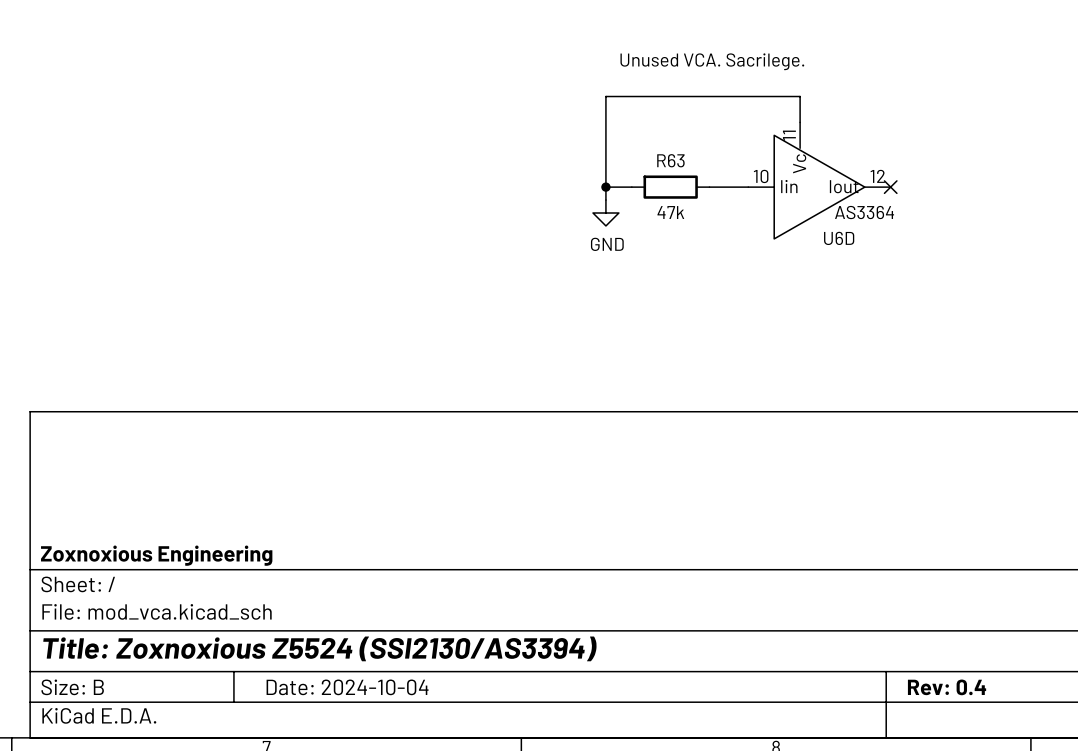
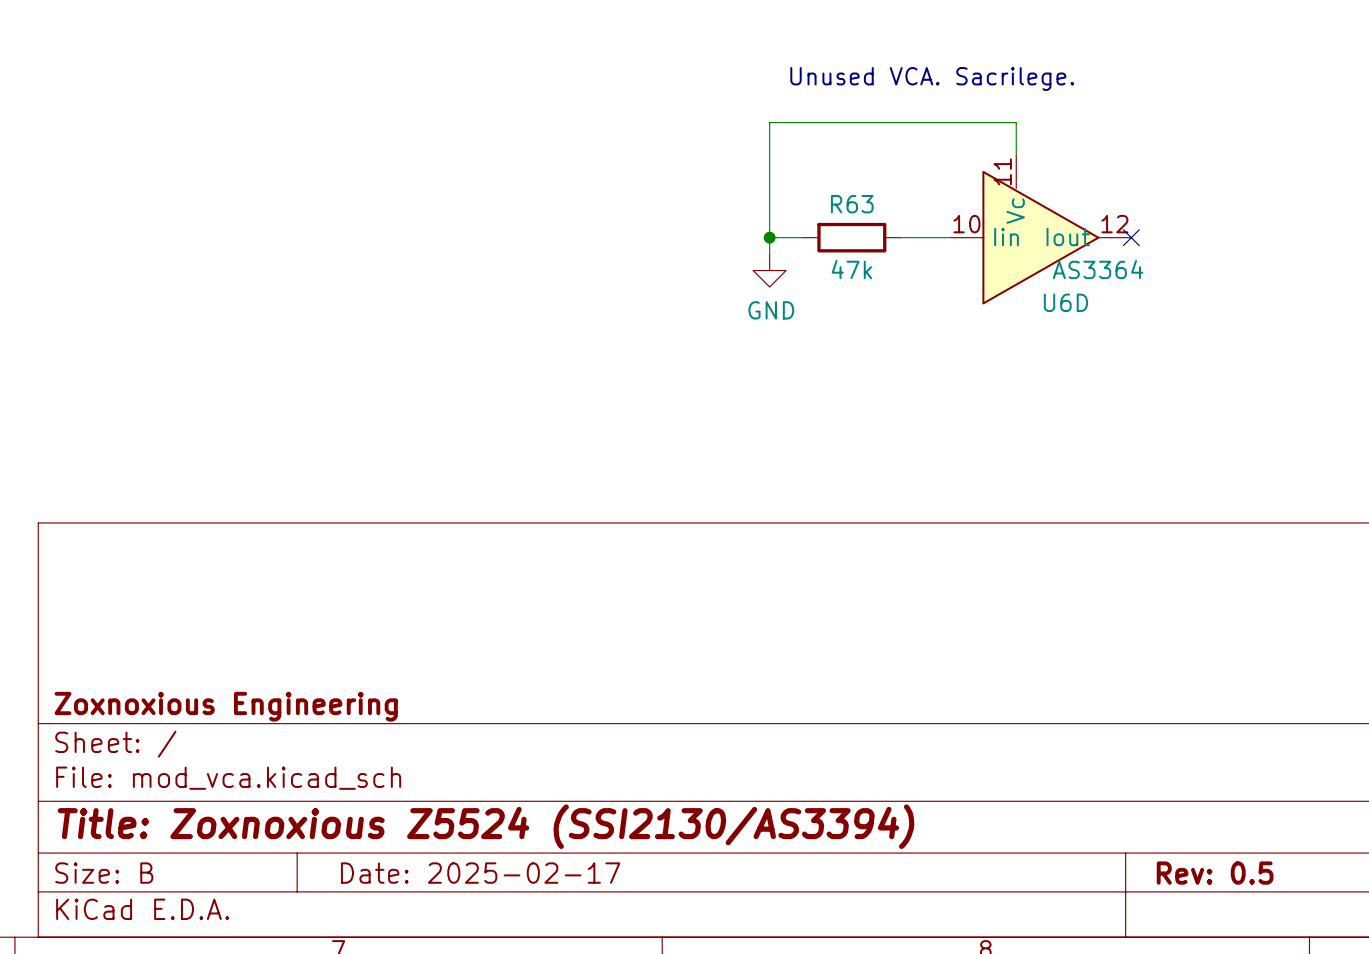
title block: Date: 2024-10-04 (347, 687) -> Date: 2025-02-17 (480, 873)
title block: Rev: 0.4 (947, 687) -> Rev: 0.5 (1215, 873)

